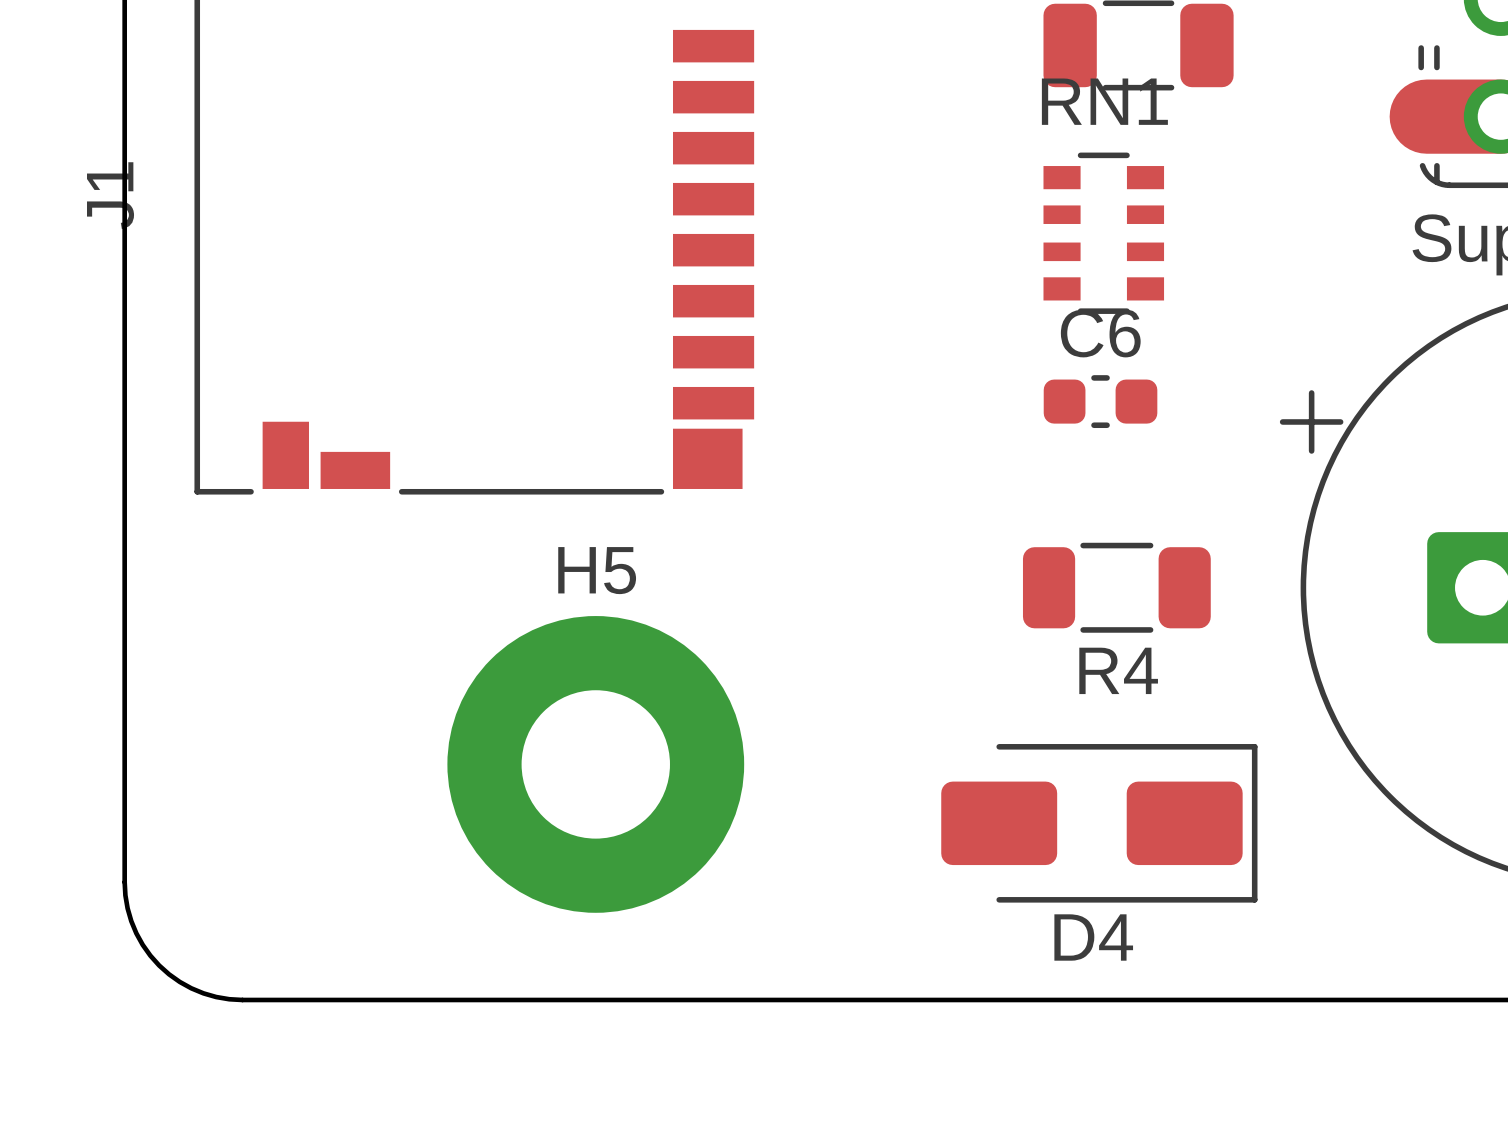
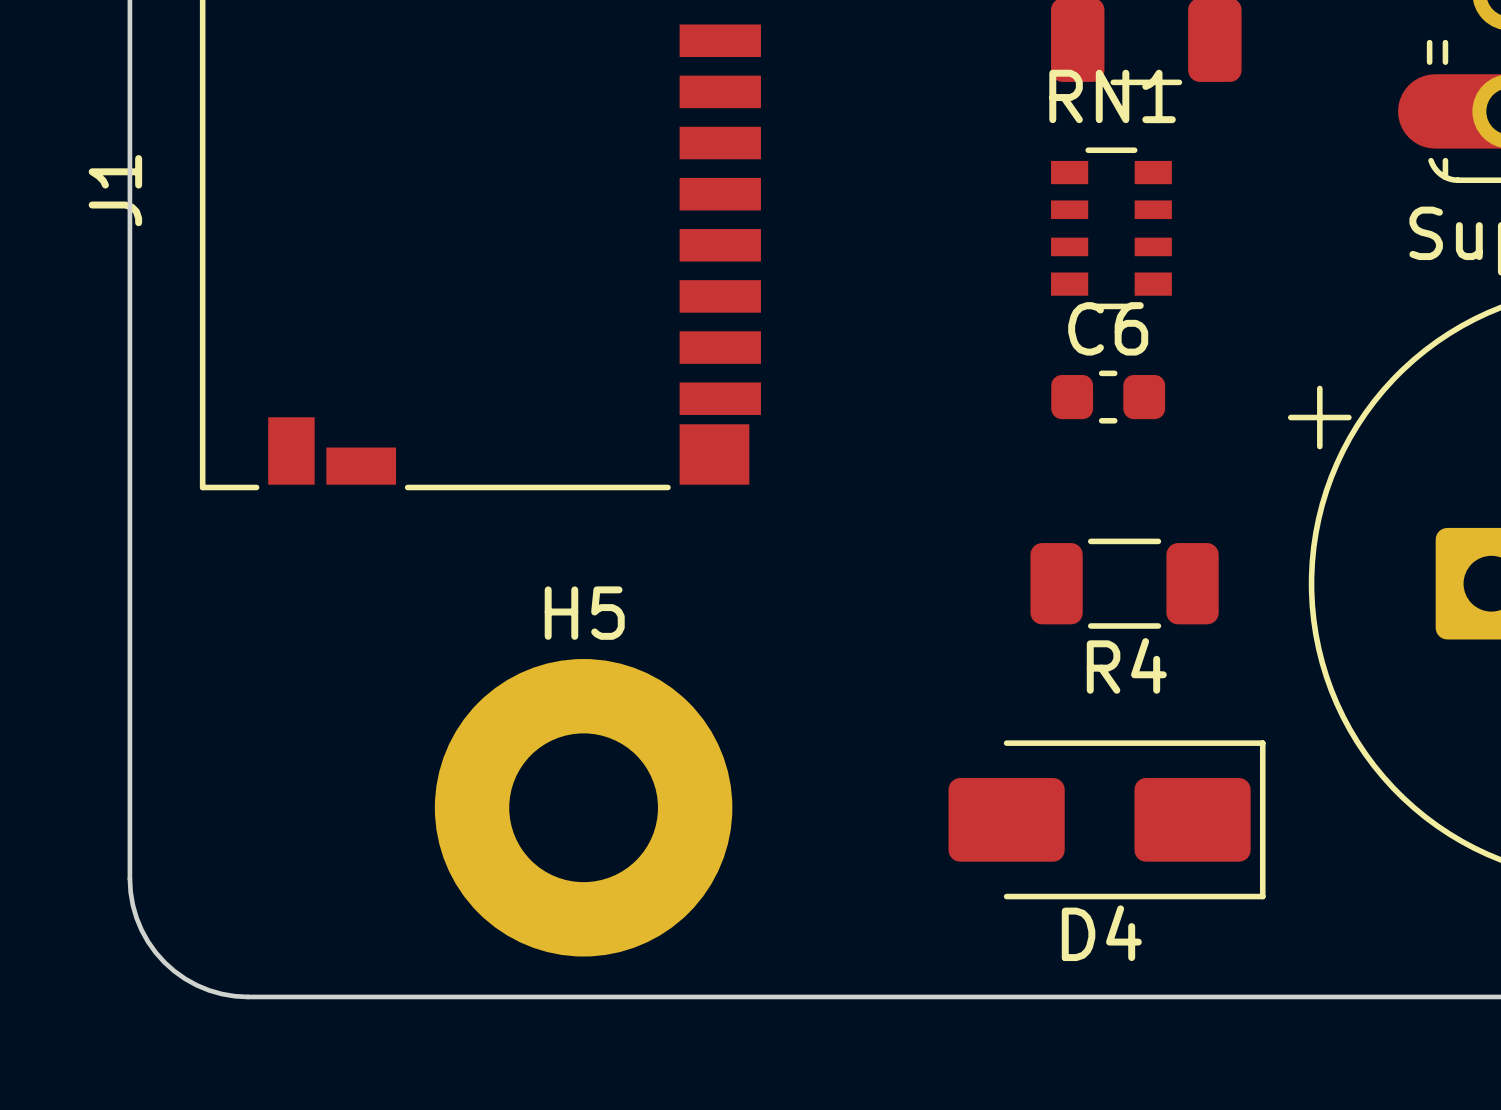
H5 position: (595, 764) -> (583, 807)

